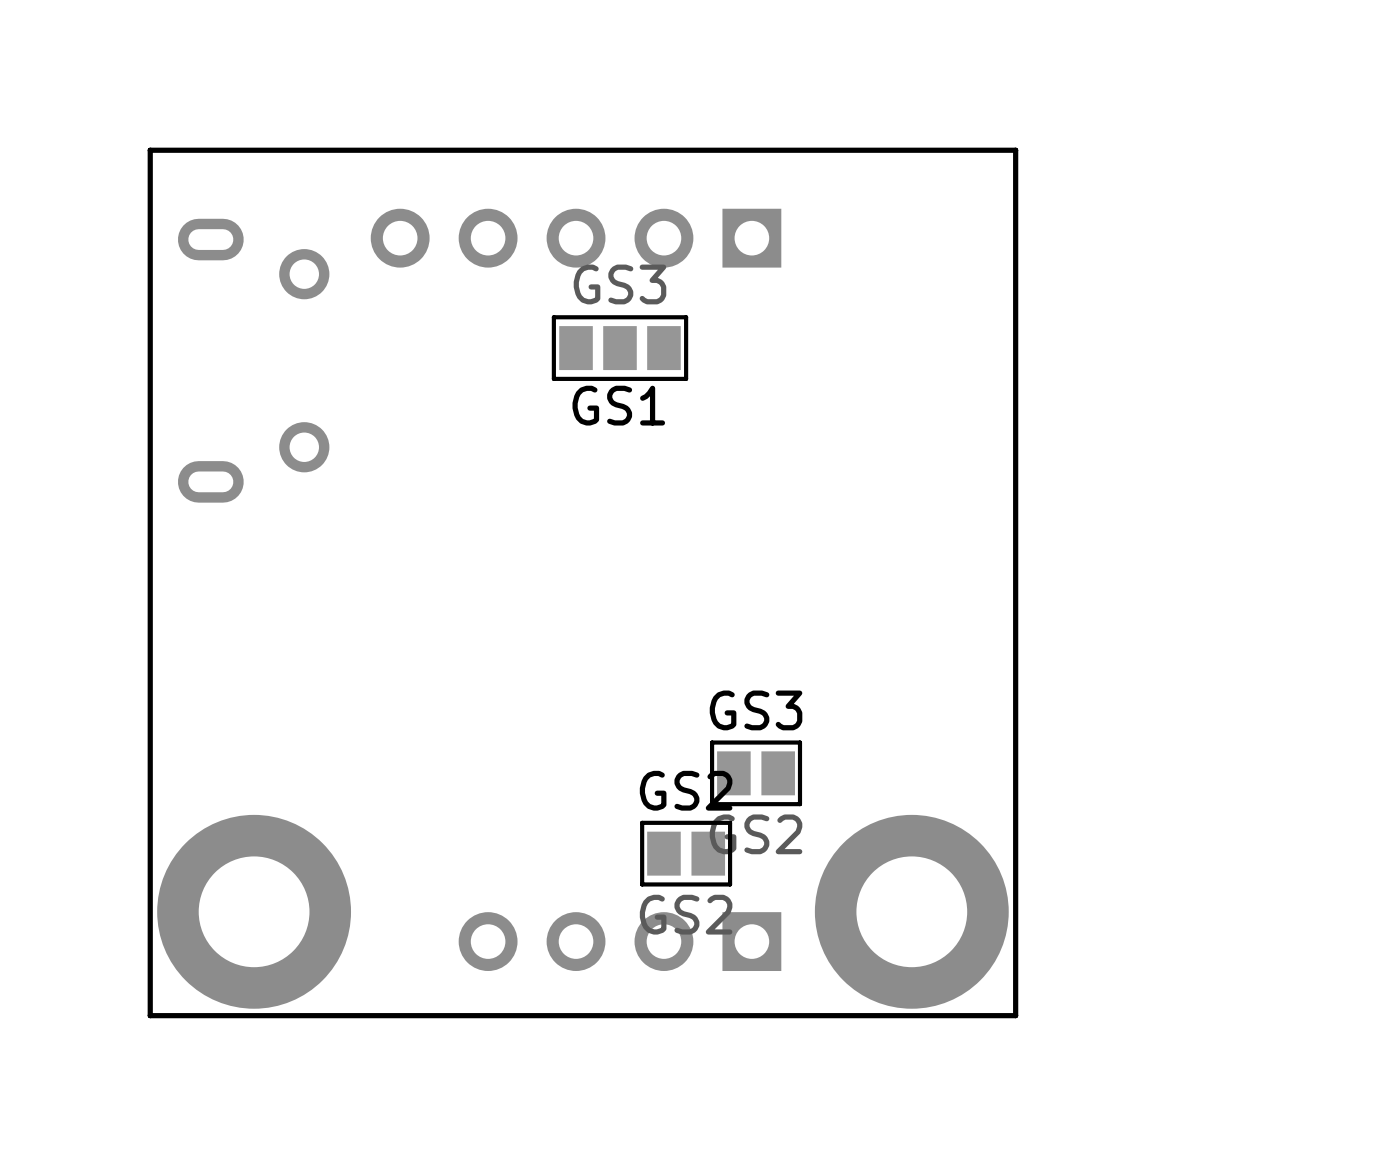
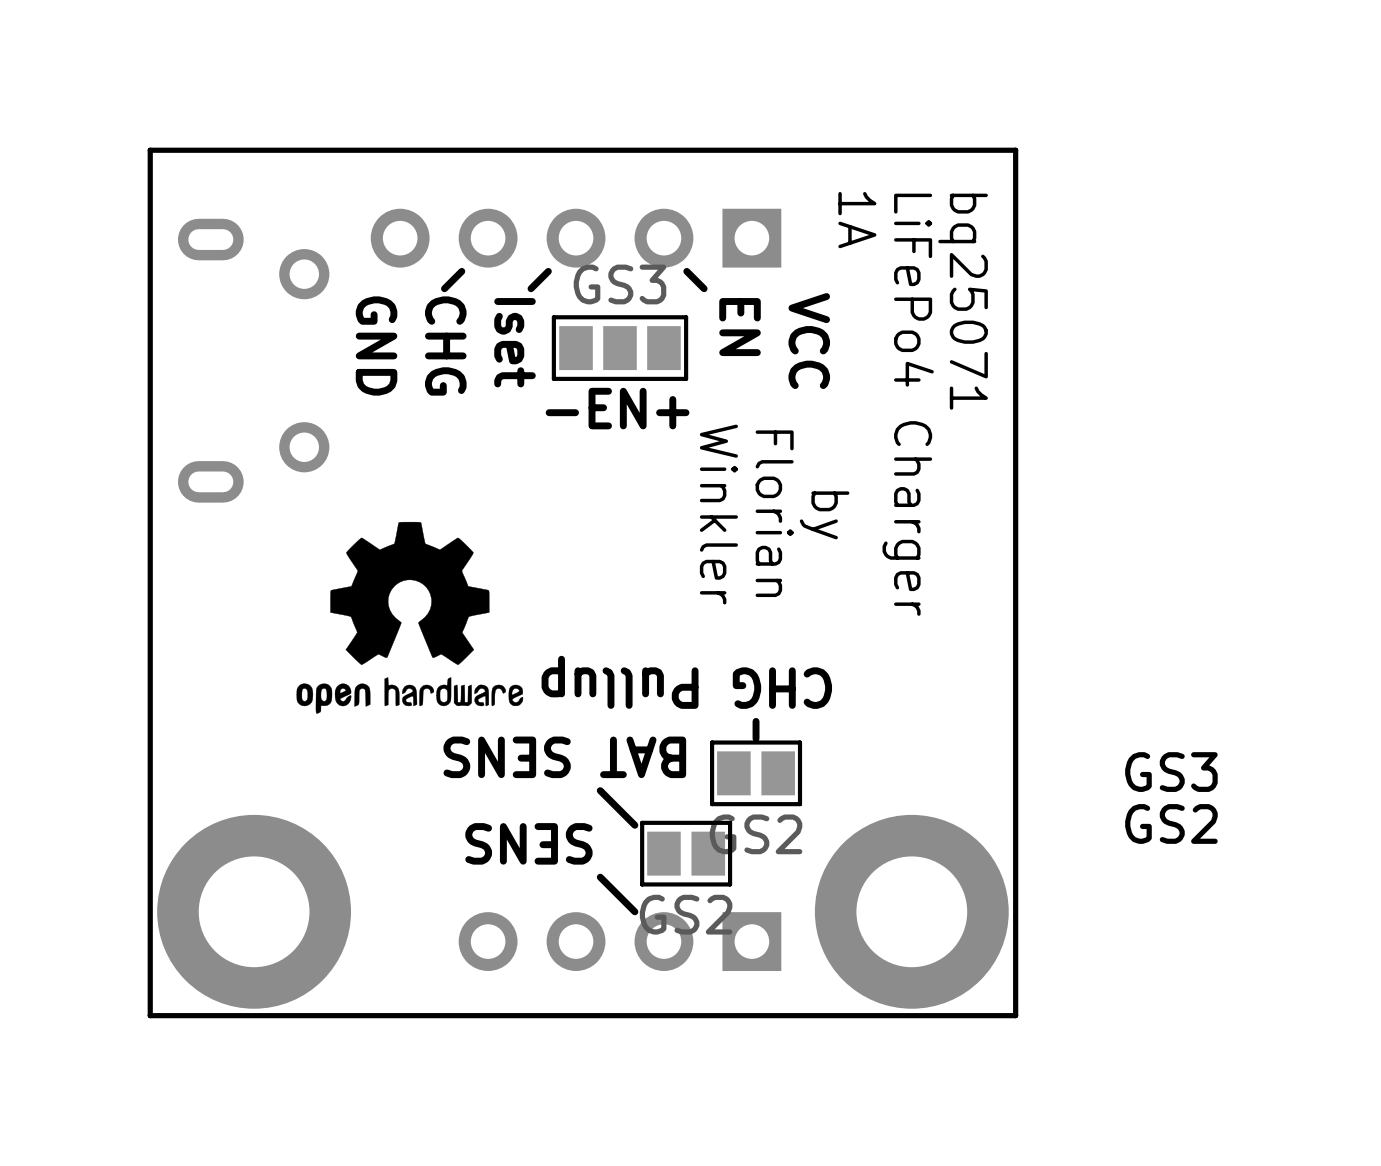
text: none -> 1A (857, 220)
line: none -> (461, 271) (444, 288)
line: none -> (548, 271) (531, 288)
line: none -> (686, 271) (704, 288)
text: none -> bq25071 (963, 301)
text: none -> EN (740, 327)
text: none -> VCC (809, 341)
text: none -> Iset (515, 342)
text: none -> GND (376, 346)
text: none -> CHG (445, 346)
text: none -> LiFePo4 Charger (908, 404)
GS1 name: GS1 (618, 405) -> none
text: none -> -EN+ (617, 408)
text: none -> Florian (774, 513)
text: none -> Winkler (718, 514)
text: none -> by (824, 515)
drawing: none -> [296, 521, 524, 714]
text: none -> CHG Pullup (686, 682)
GS3 name position: GS3 (756, 710) -> GS3 (1171, 772)
line: none -> (756, 721) (756, 738)
text: none -> BAT SENS (564, 757)
line: none -> (600, 790) (634, 825)
GS2 name position: GS2 (686, 790) -> GS2 (1171, 823)
text: none -> SENS (528, 843)
line: none -> (600, 877) (634, 911)

